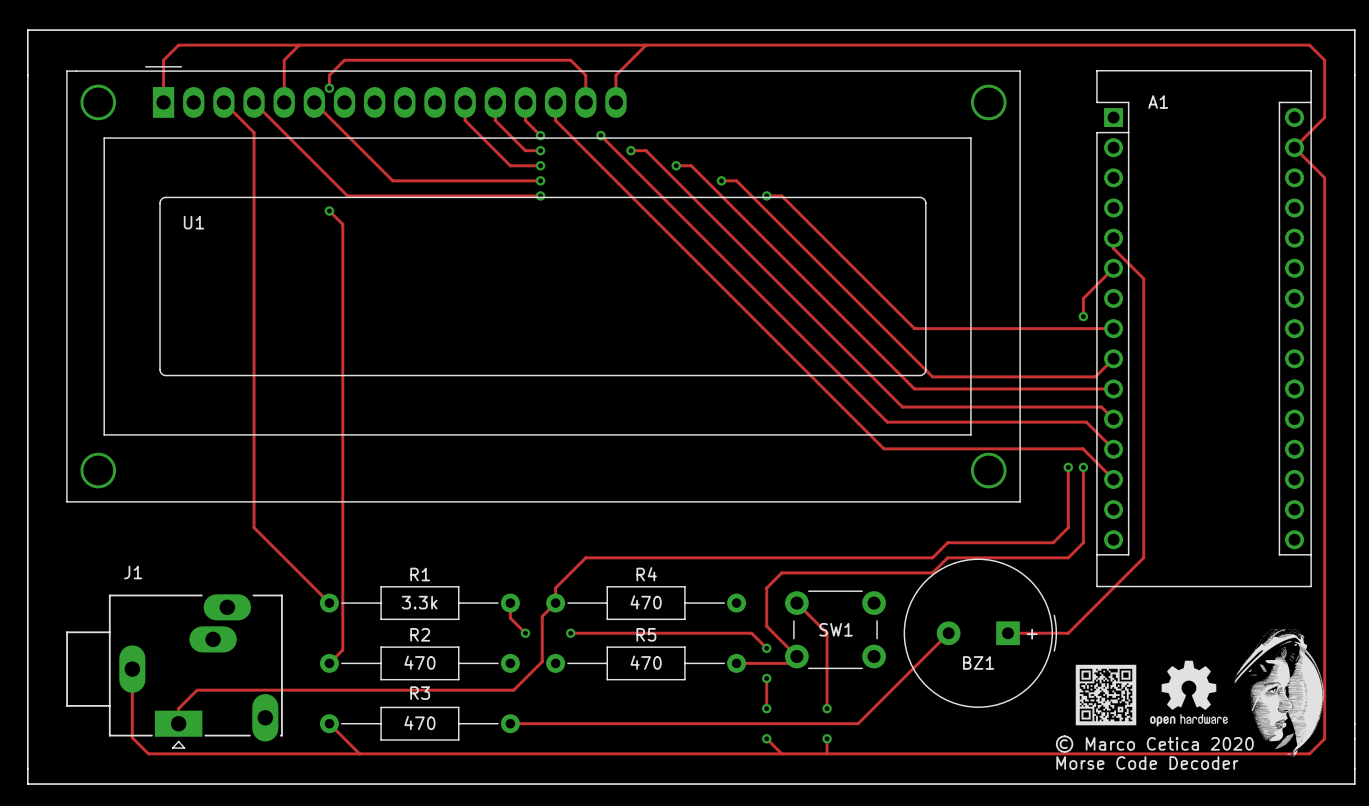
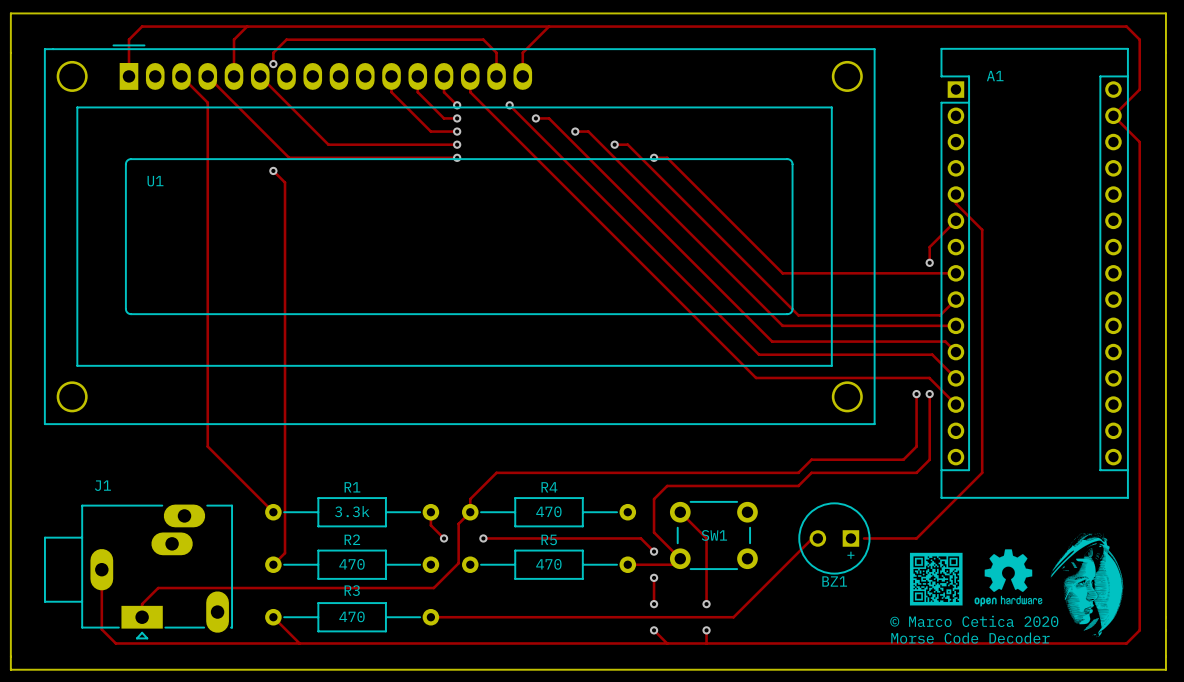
BZ1 footprint: [903, 558, 1058, 708] -> [798, 502, 871, 575]
drawing: none -> [1050, 533, 1124, 638]
drawing: [1234, 628, 1324, 758] -> none
text: + (1032, 634) -> none
drawing position: (1188, 693) -> (1008, 577)
drawing position: (1106, 695) -> (936, 579)
text position: © Marco Cetica 2020 (1154, 744) -> © Marco Cetica 2020 (974, 621)
text position: Morse Code Decoder (1147, 762) -> Morse Code Decoder (970, 638)

